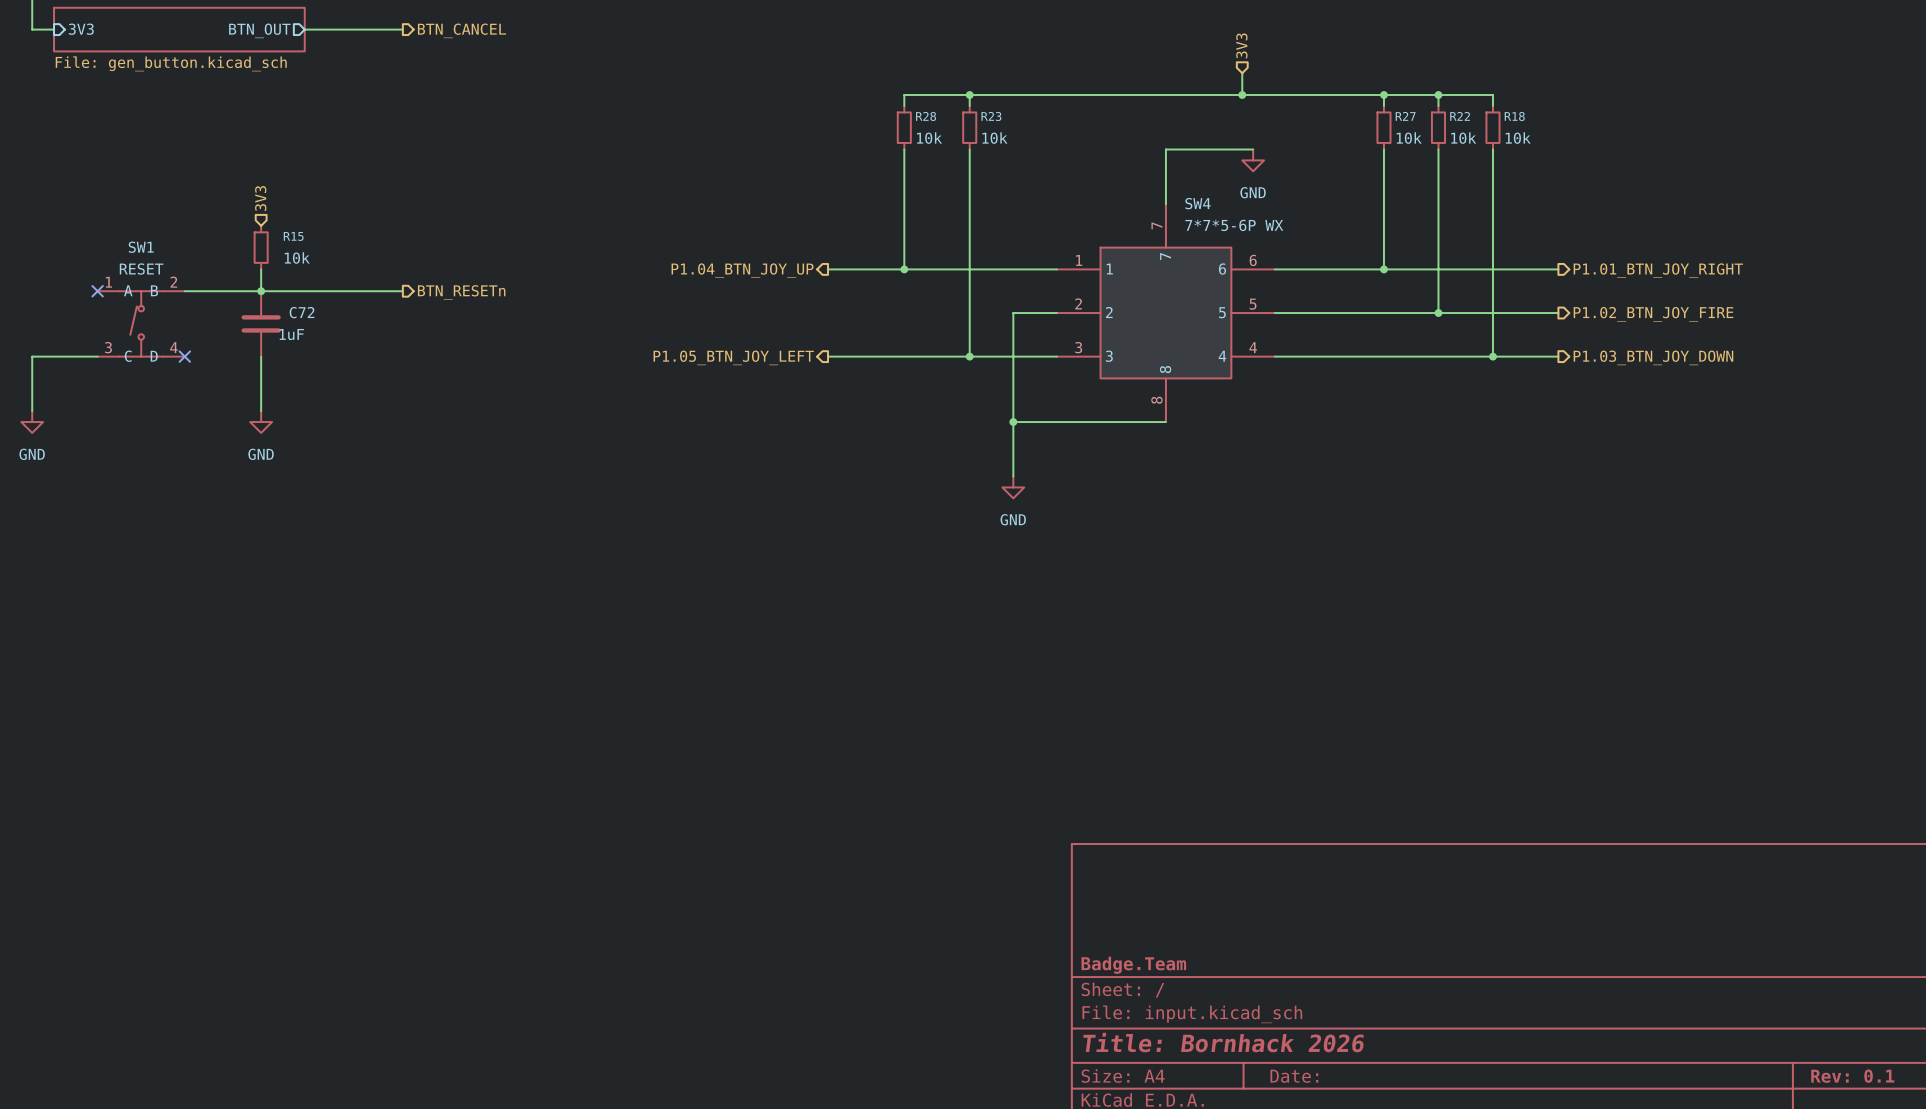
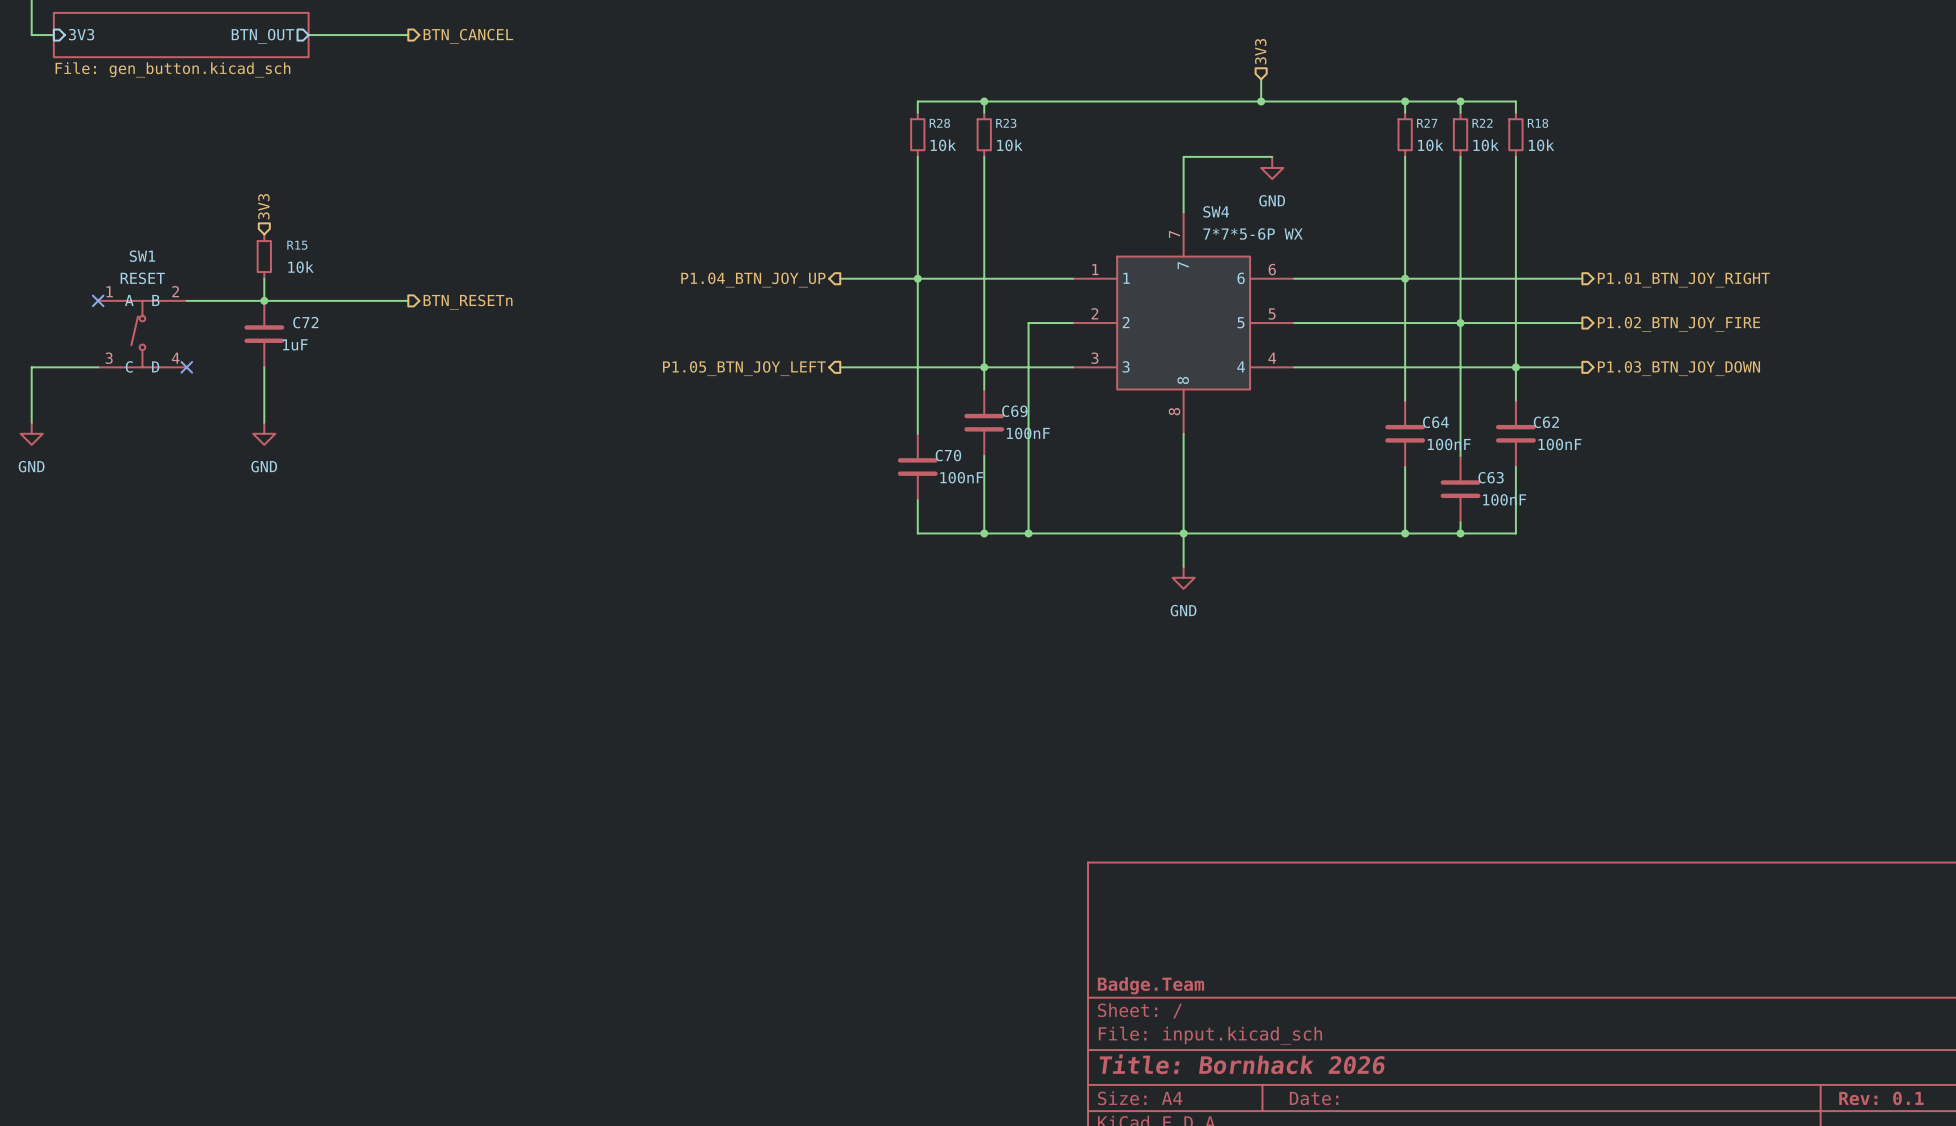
wire: none -> (917, 278) (917, 433)
wire: none -> (1405, 278) (1405, 400)
wire: none -> (1460, 323) (1460, 455)
wire: none -> (984, 367) (984, 389)
wire: none -> (1515, 367) (1515, 400)
C69: none -> 100nF (984, 422)
wire: (1013, 422) (1165, 422) -> (1183, 566) (1183, 433)
junction: (1013, 422) -> none
C64: none -> 100nF (1405, 433)
C62: none -> 100nF (1515, 433)
wire: none -> (984, 455) (984, 533)
C70: none -> 100nF (917, 467)
wire: none -> (1405, 467) (1405, 533)
wire: none -> (1515, 467) (1515, 533) (917, 533) (917, 500)
wire: none -> (1028, 489) (1028, 533)
C63: none -> 100nF (1460, 489)
power symbol position: GND (1013, 487) -> GND (1183, 577)
wire: none -> (1460, 522) (1460, 533)
junction: none -> (984, 533)
junction: none -> (1028, 533)
junction: none -> (1183, 533)
junction: none -> (1405, 533)
junction: none -> (1460, 533)

